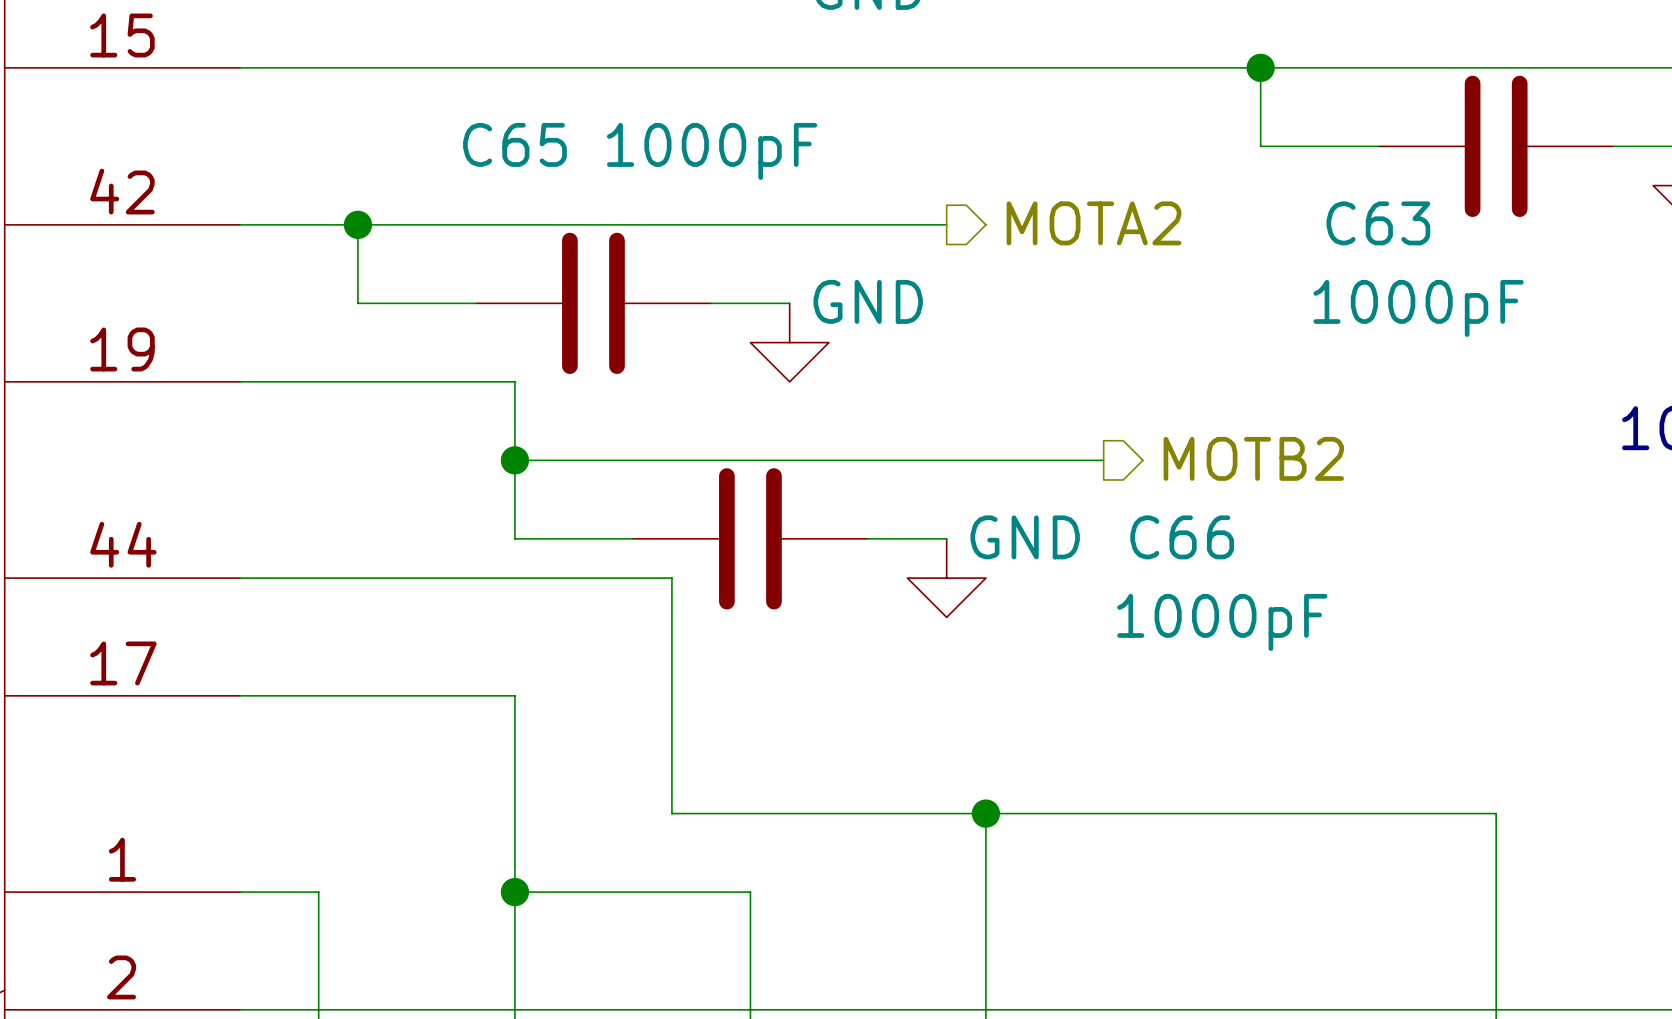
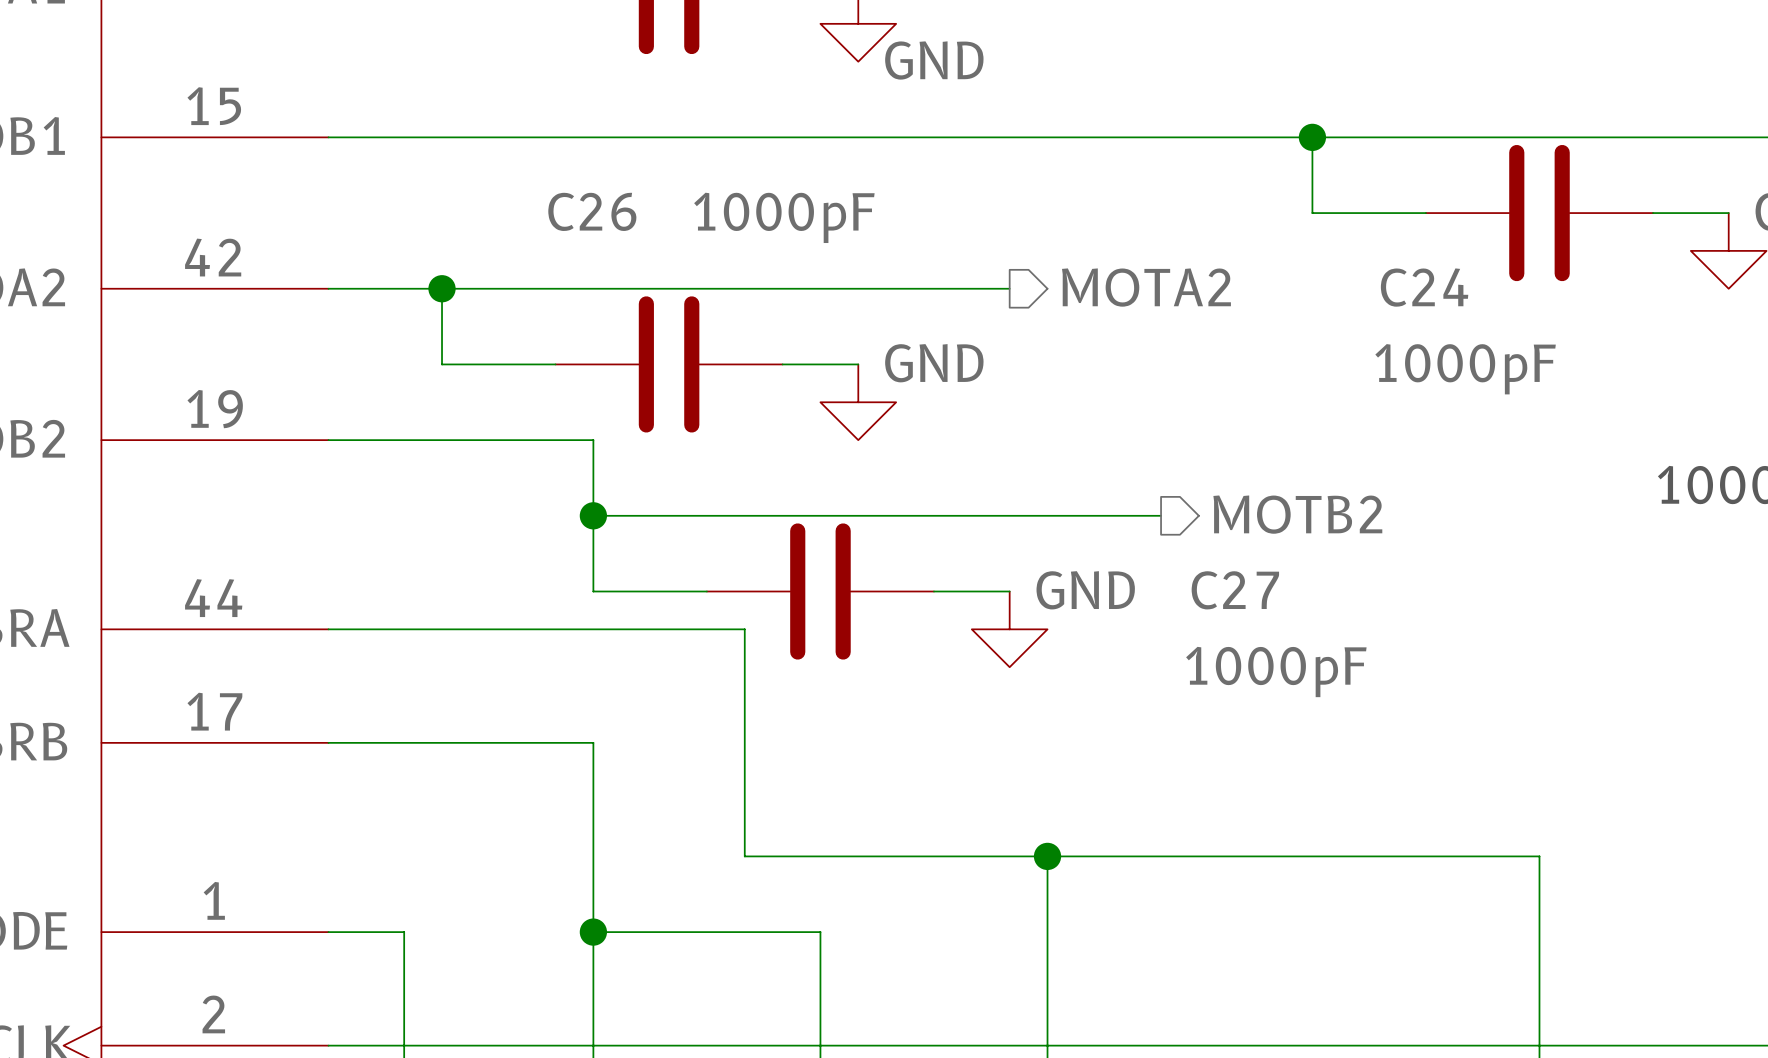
C65 name: C65 (514, 144) -> C26 (592, 211)
C63 name: C63 (1378, 223) -> C24 (1424, 287)
C66 name: C66 (1182, 537) -> C27 (1235, 590)

